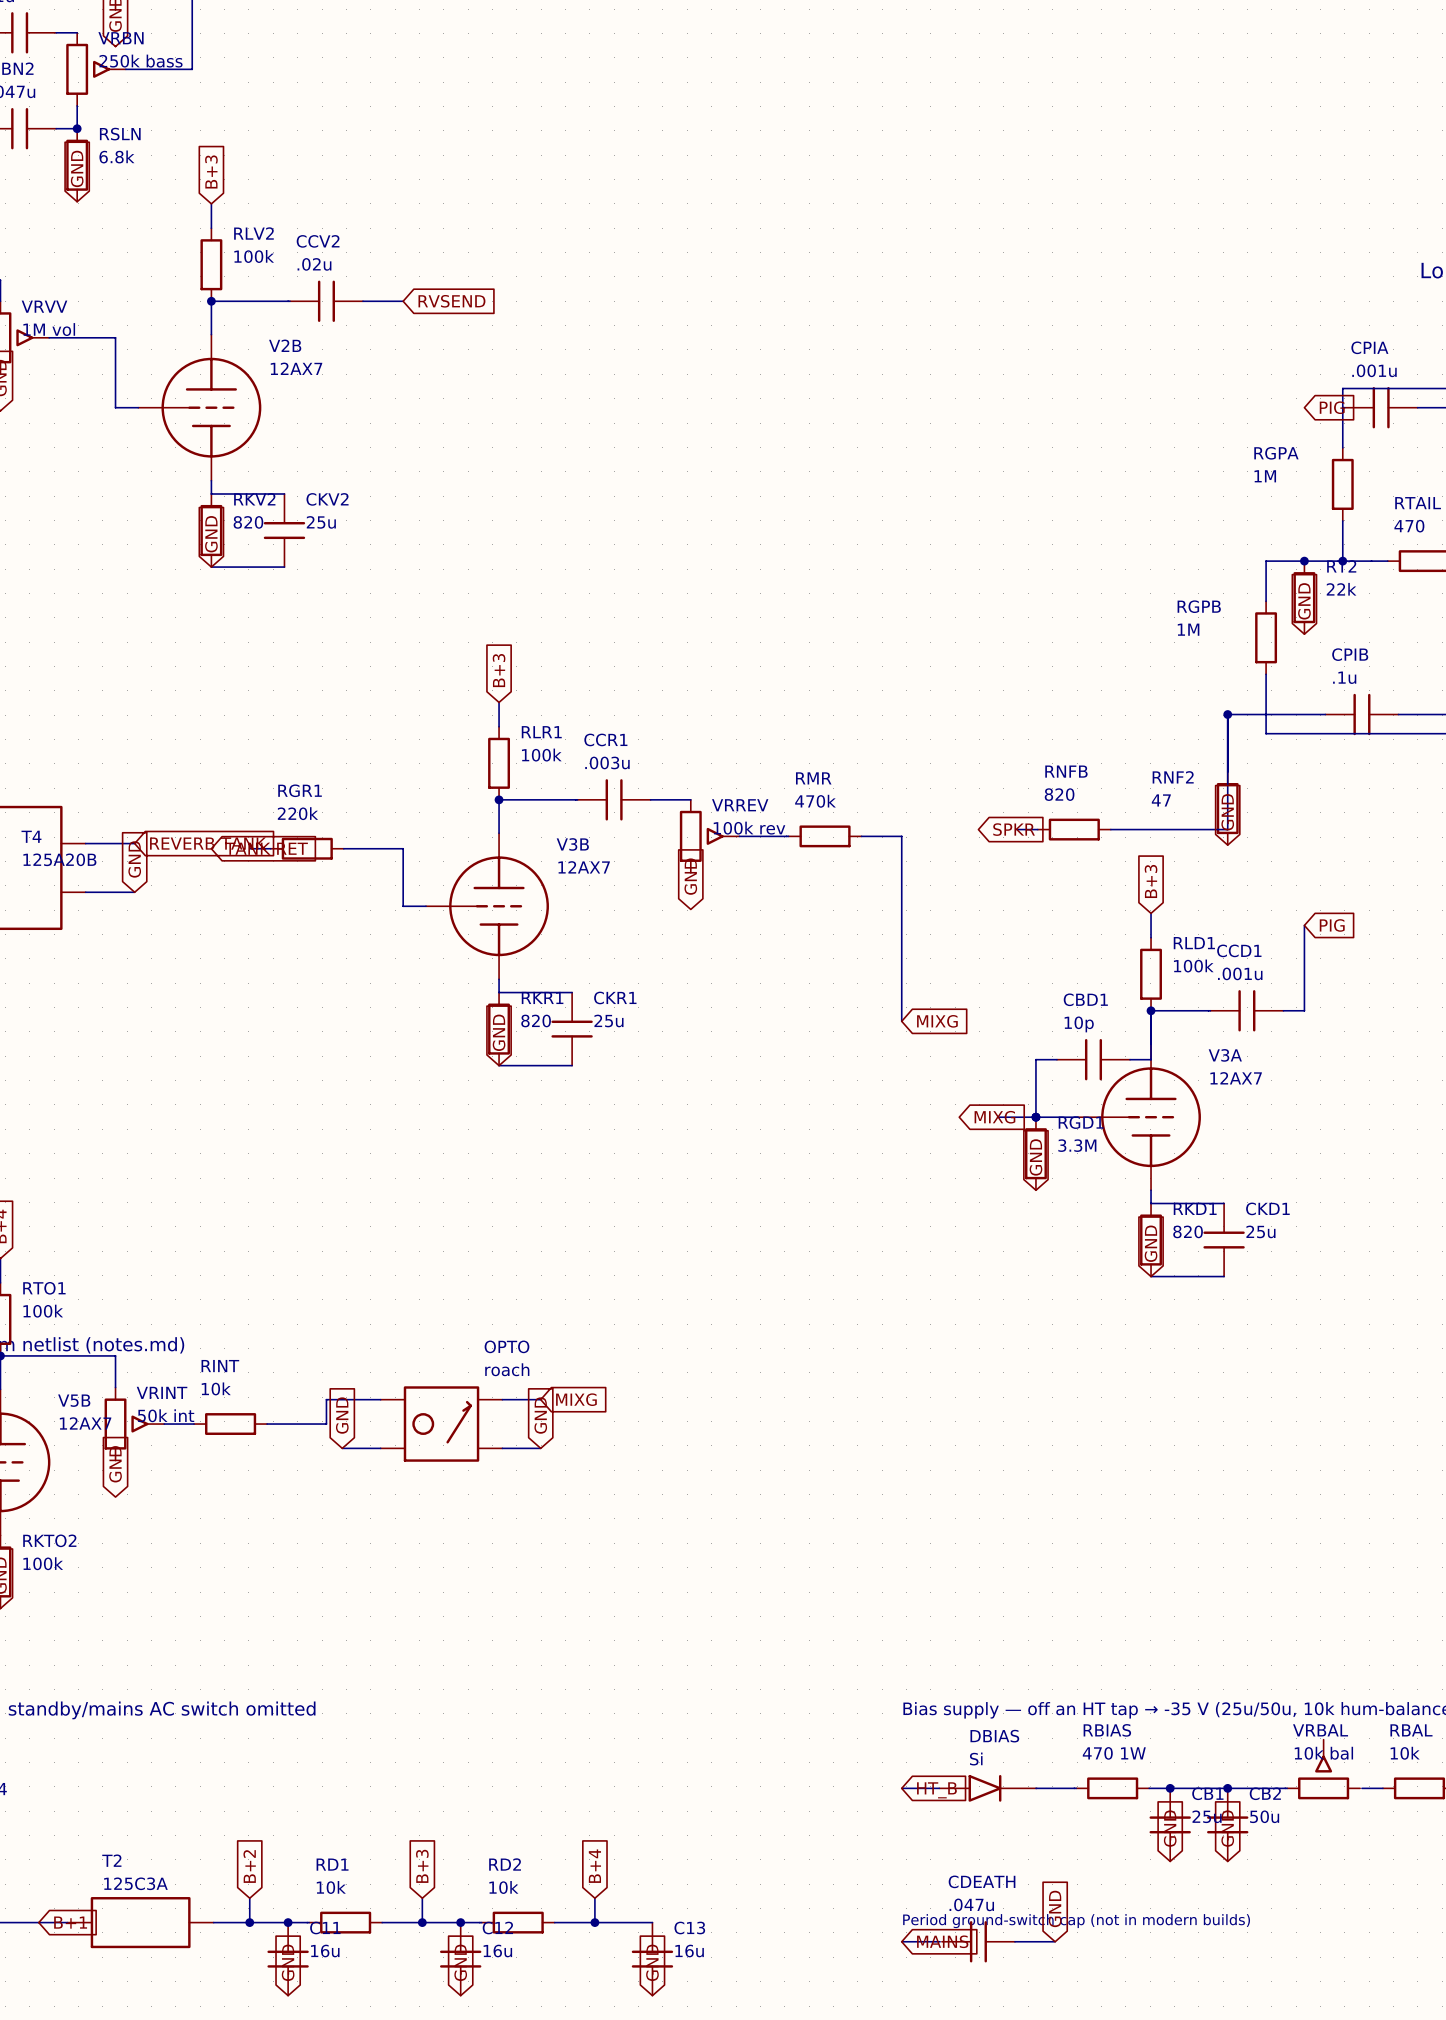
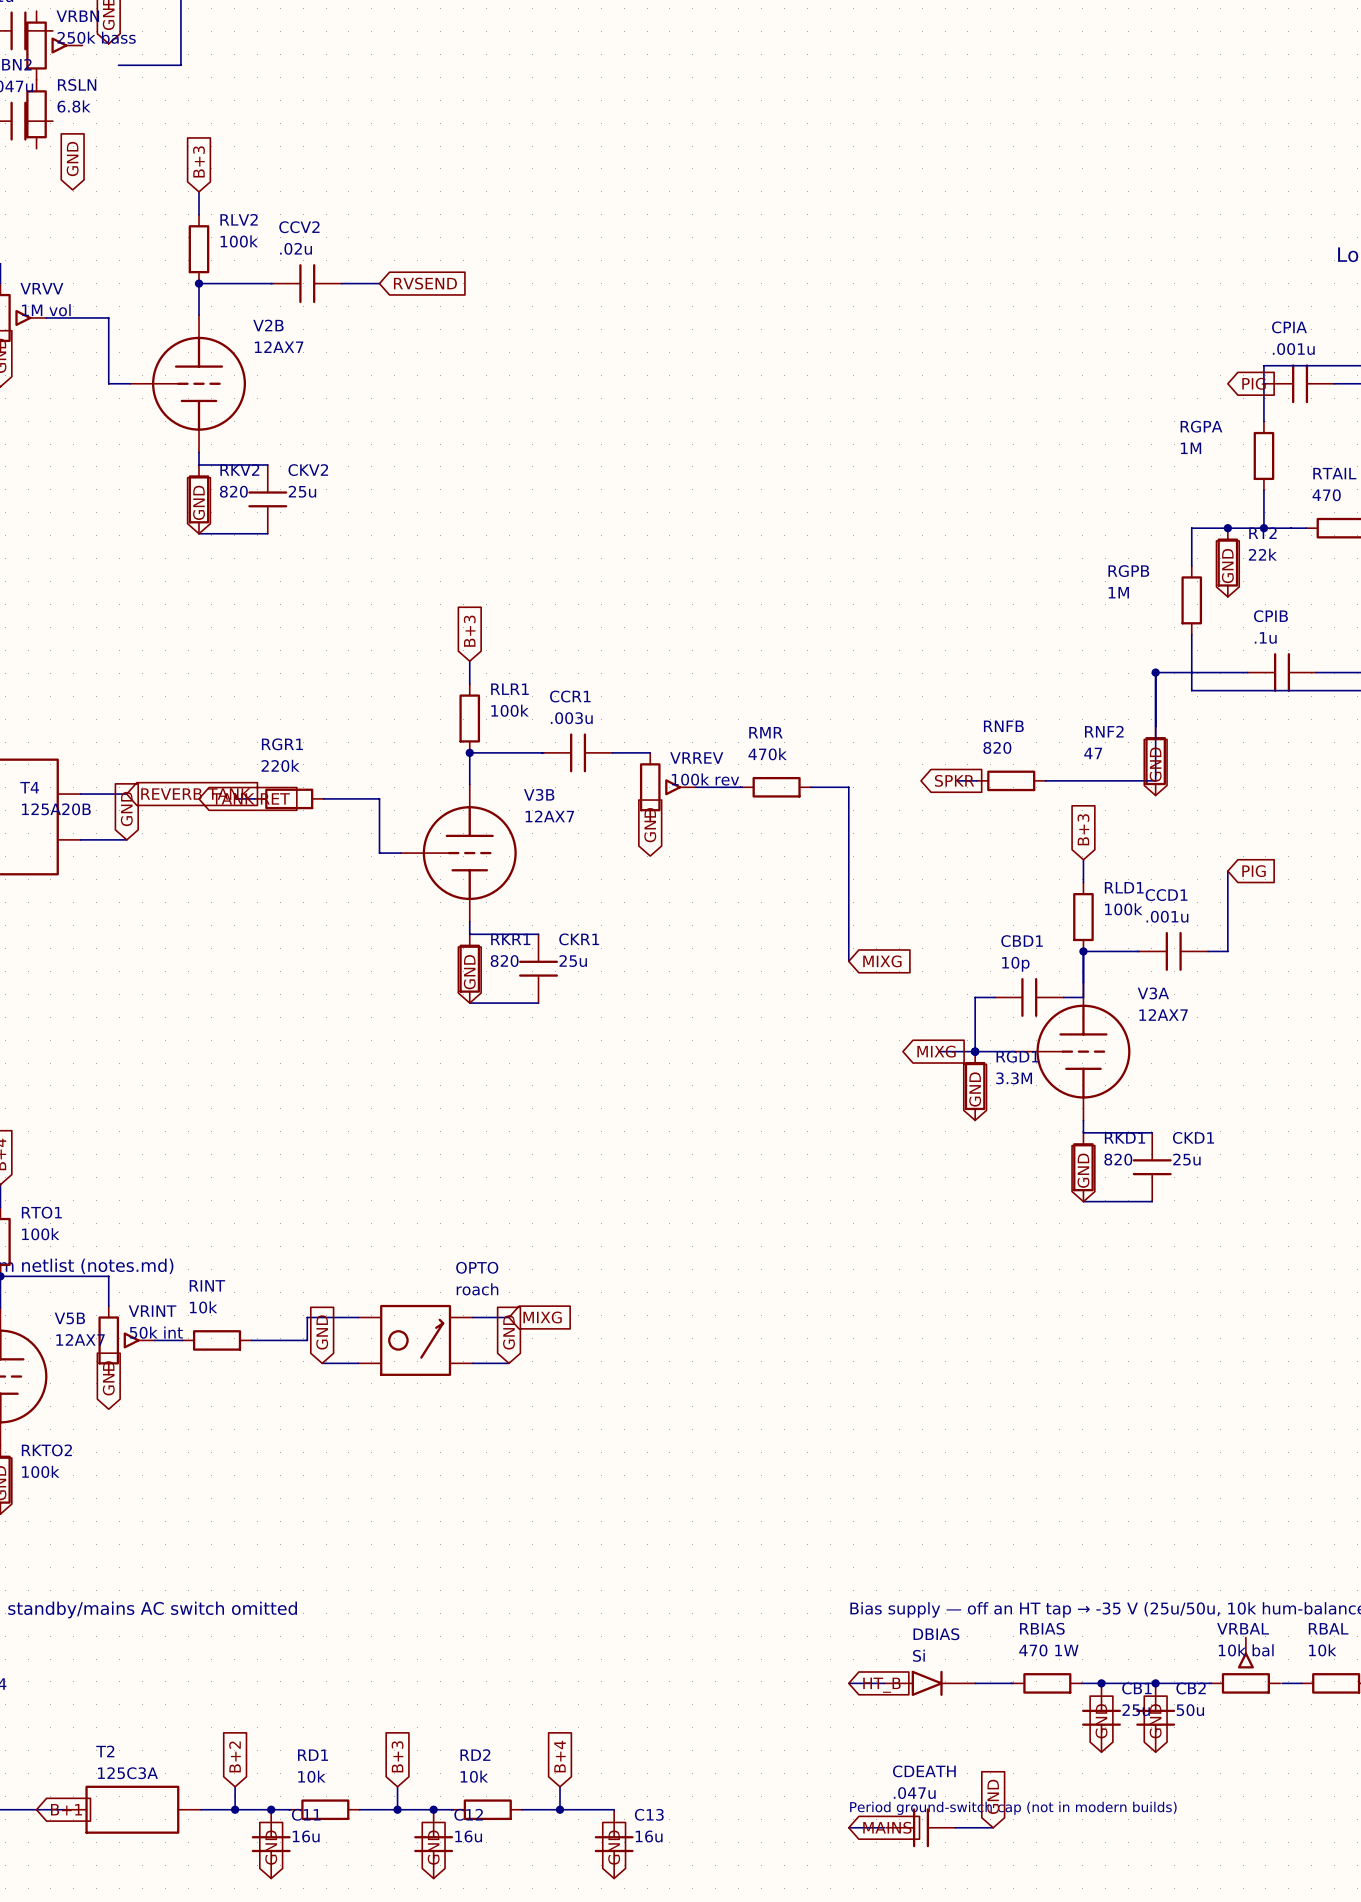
wire: (56, 32) (77, 32) -> none
VRBN position: (96, 69) -> (54, 45)
wire: (77, 105) (77, 128) (56, 128) -> none
junction: (77, 128) -> none
RSLN position: (77, 165) -> (36, 114)

